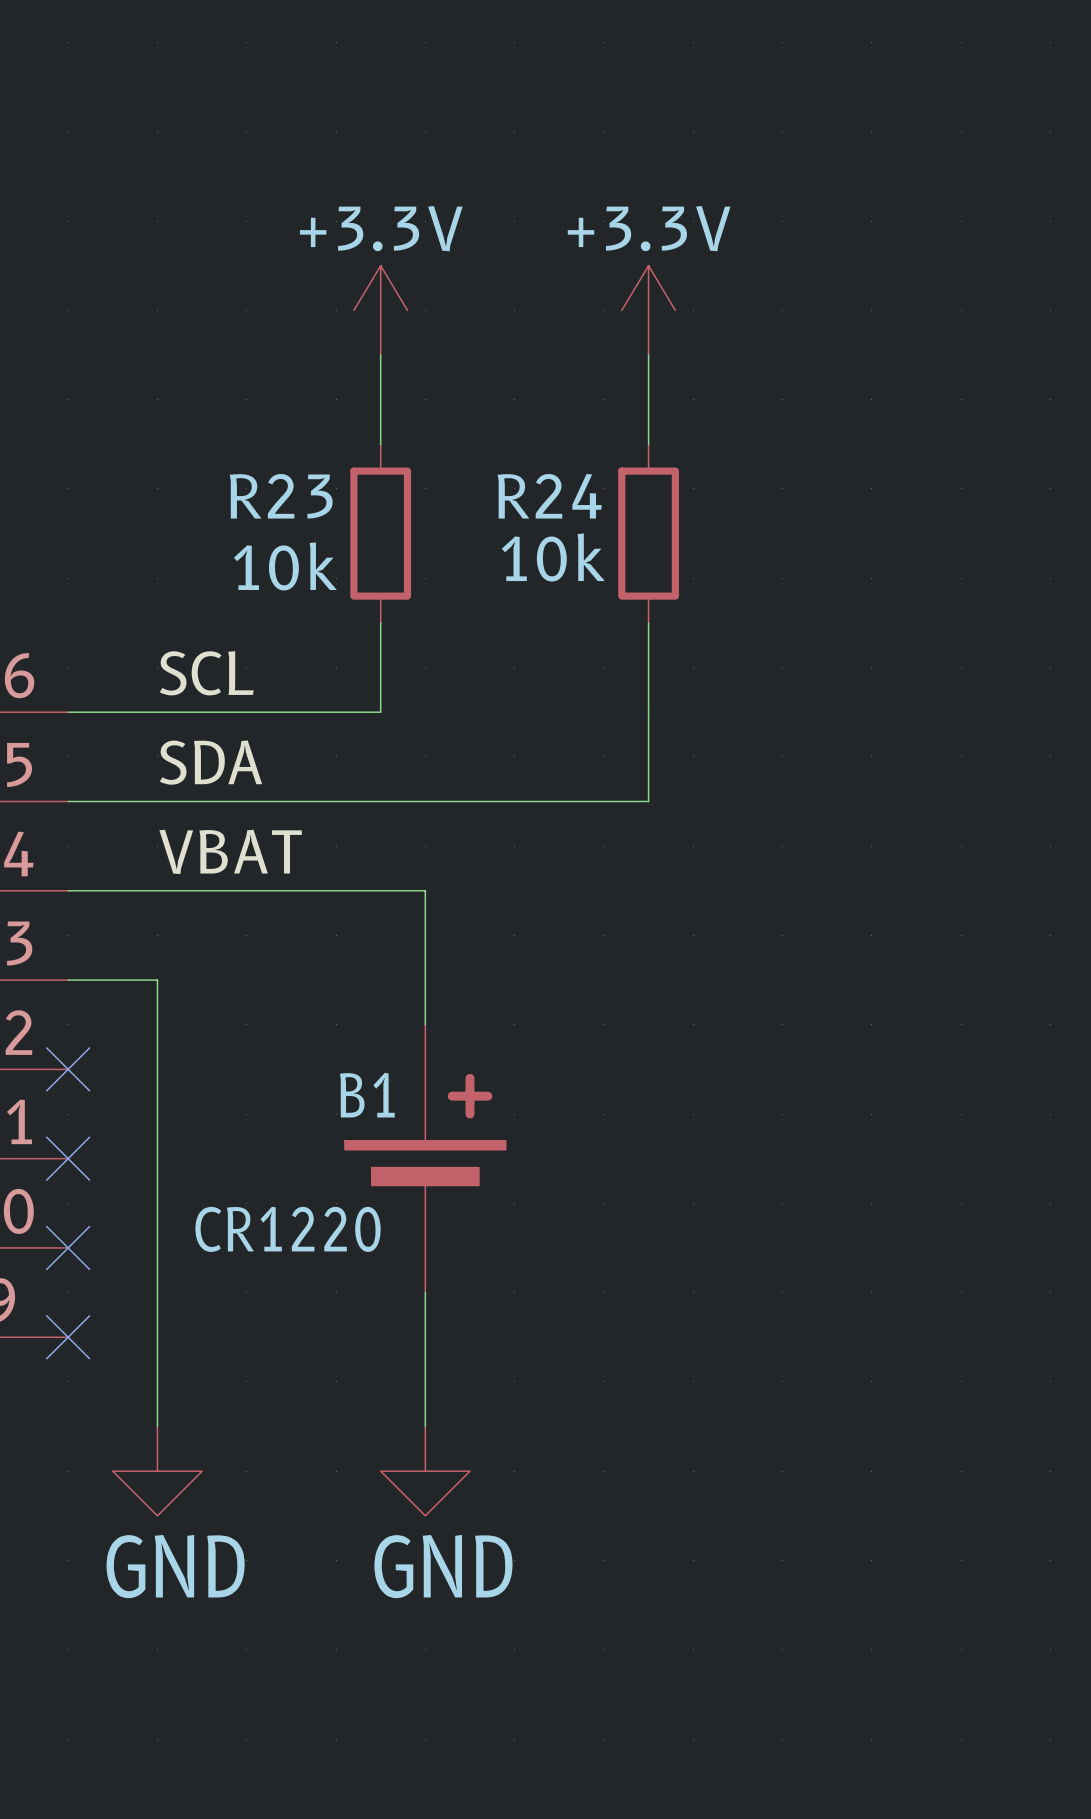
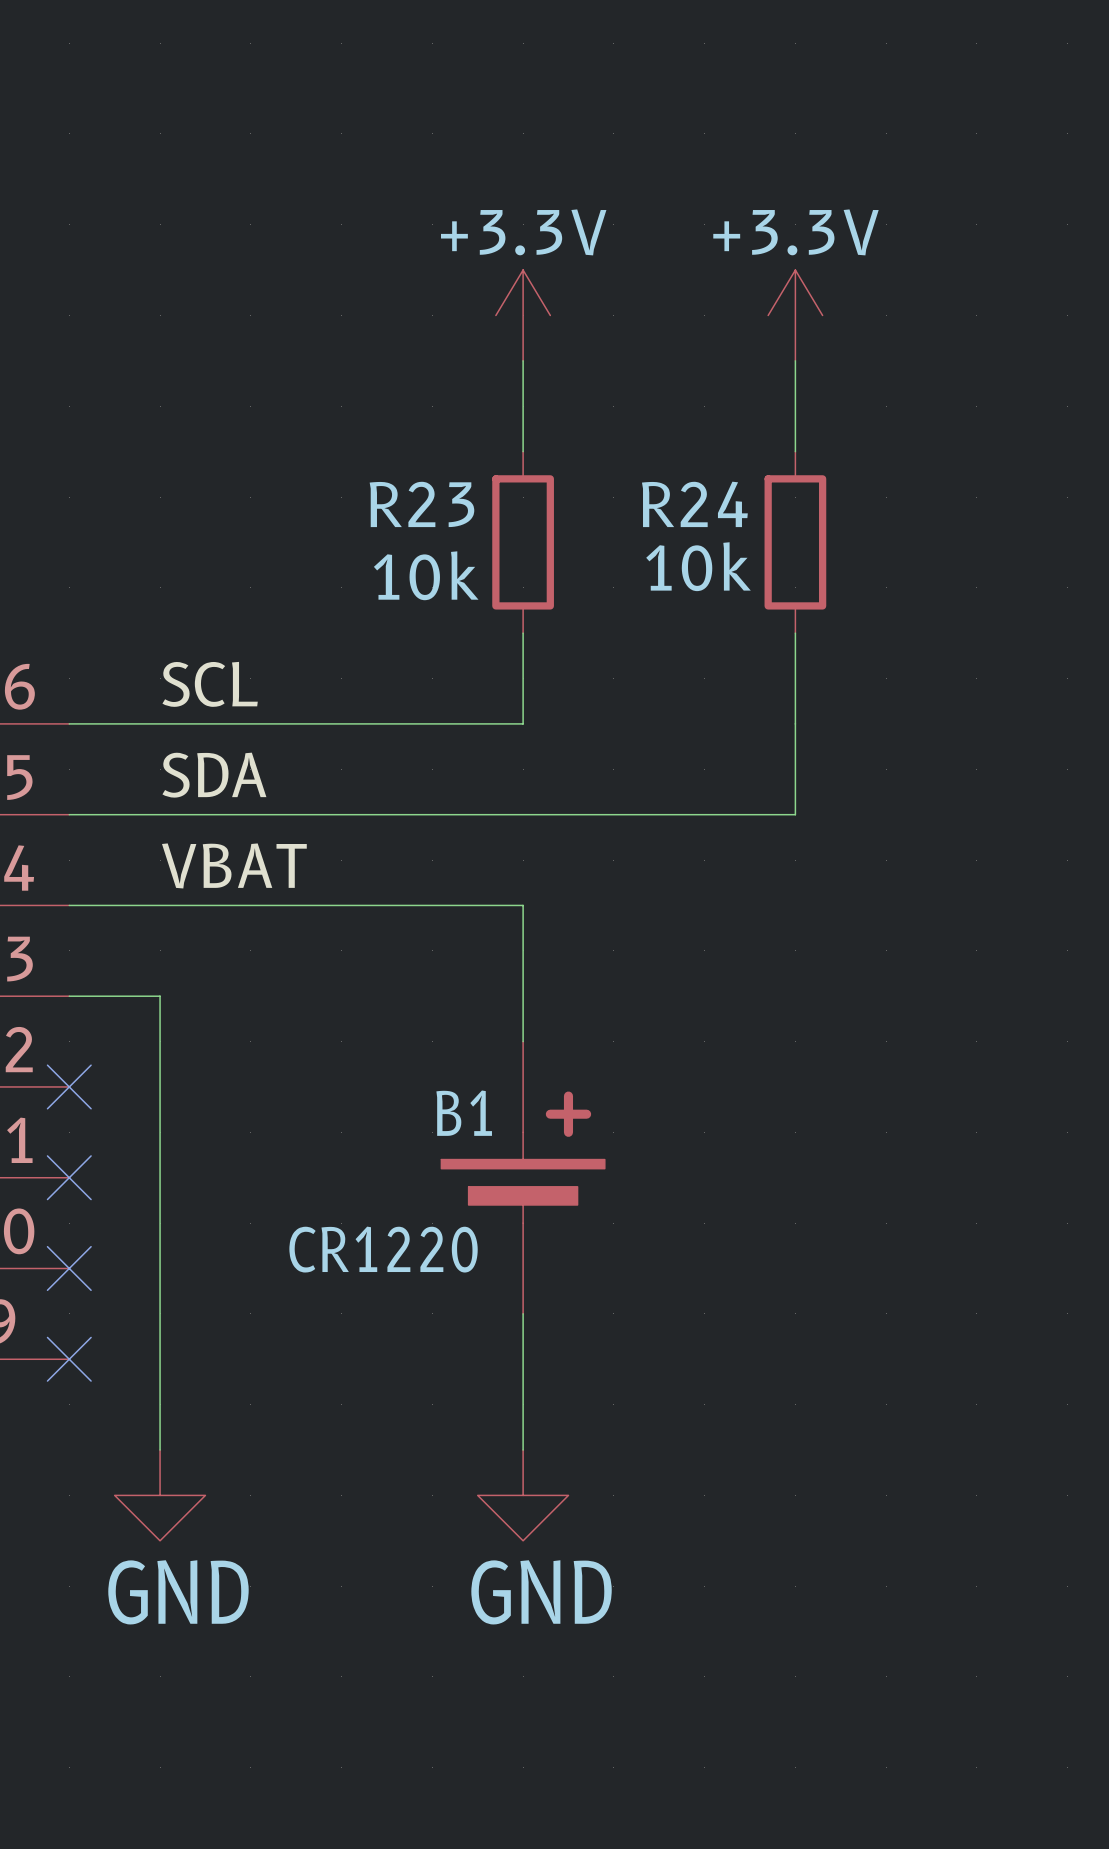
power symbol: +3.3V (380, 310) -> none
power symbol: none -> +3.3V (523, 315)
power symbol: +3.3V (648, 310) -> none
power symbol: none -> +3.3V (795, 315)
wire: (380, 355) (380, 444) -> (523, 360) (523, 451)
wire: (648, 355) (648, 444) -> (795, 360) (795, 451)
R23 position: (380, 533) -> (523, 542)
R24 position: (648, 533) -> (795, 542)
wire: (380, 622) (380, 712) -> (523, 633) (523, 723) (386, 723)
wire: (648, 622) (648, 801) -> (795, 633) (795, 814) (659, 814)
wire: (425, 890) (425, 1024) -> (432, 905) (523, 905) (523, 1041)
B1 position: (425, 1158) -> (523, 1177)
wire: (425, 1292) (425, 1426) -> (523, 1313) (523, 1450)
power symbol position: GND (425, 1471) -> GND (523, 1495)

